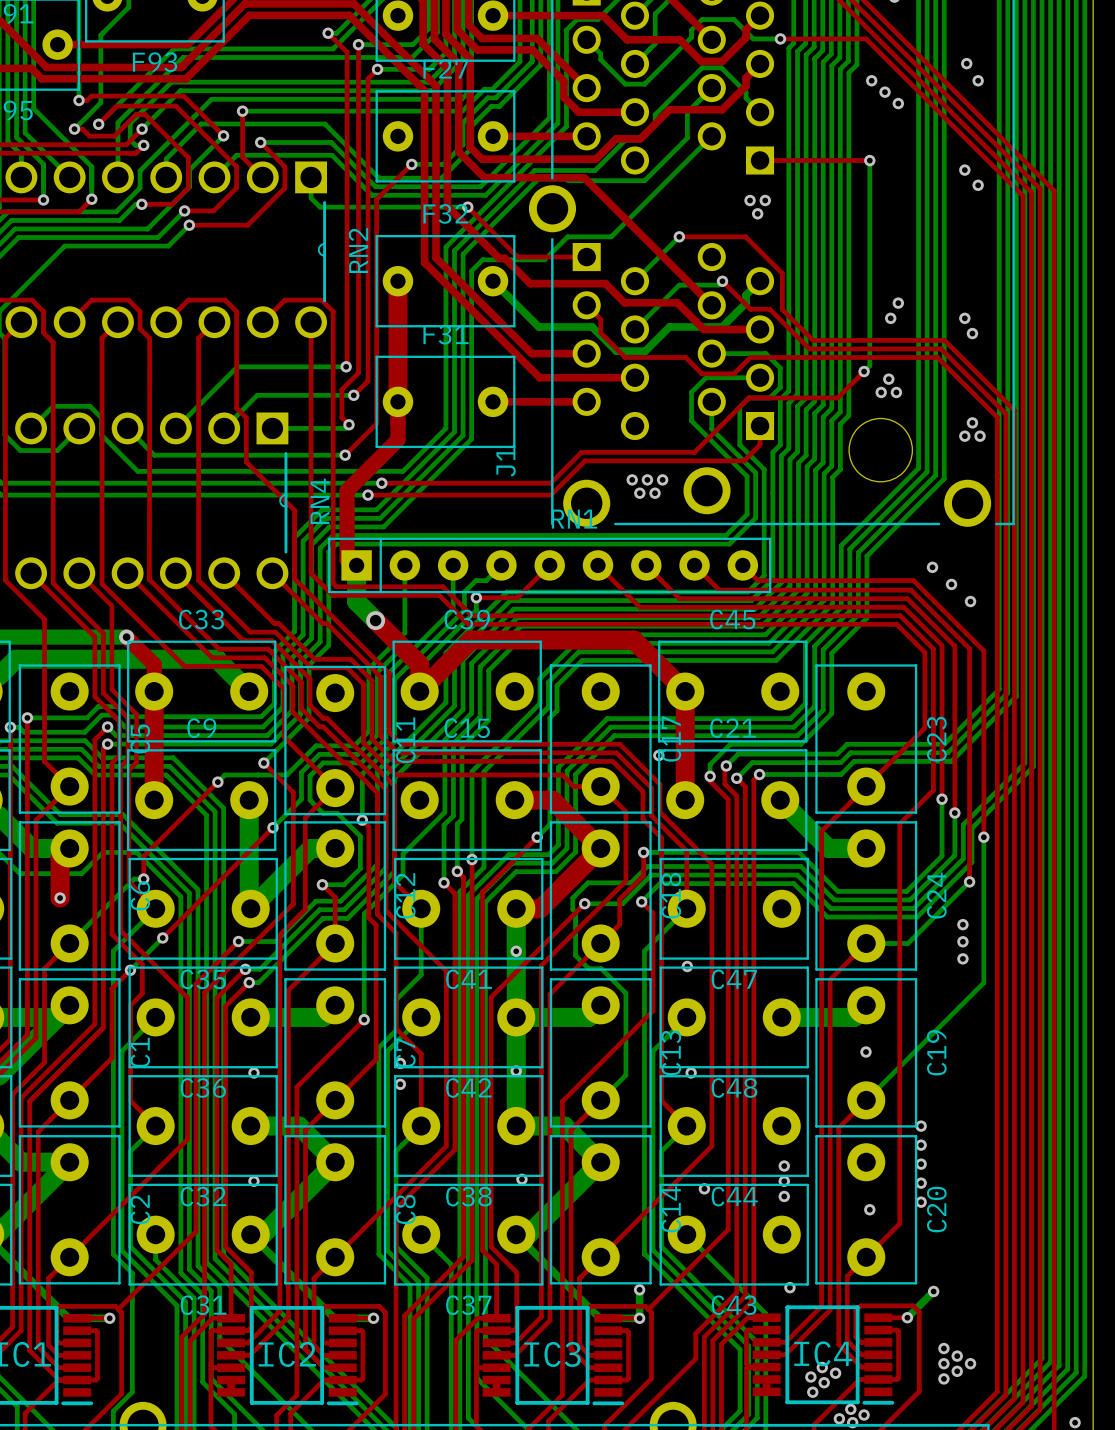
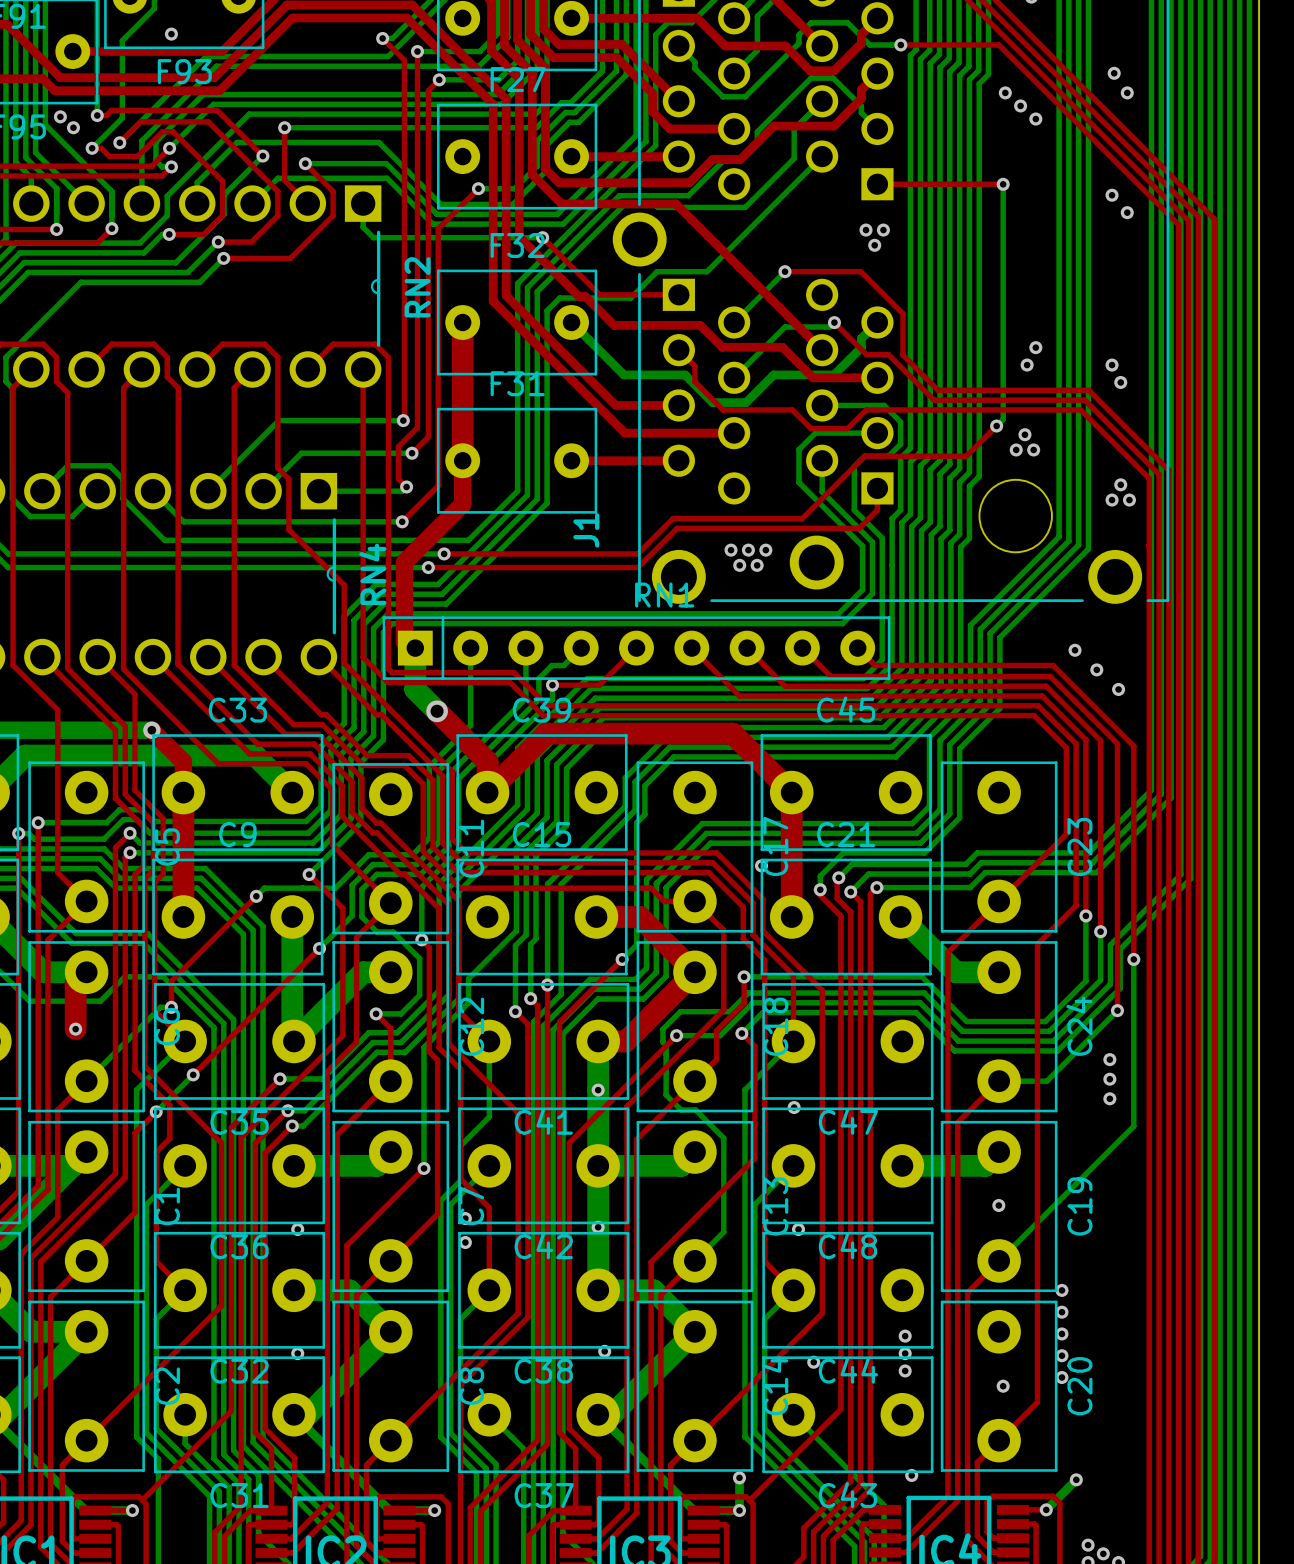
via: none -> (171, 34)
via: none -> (60, 116)
via: none -> (73, 127)

